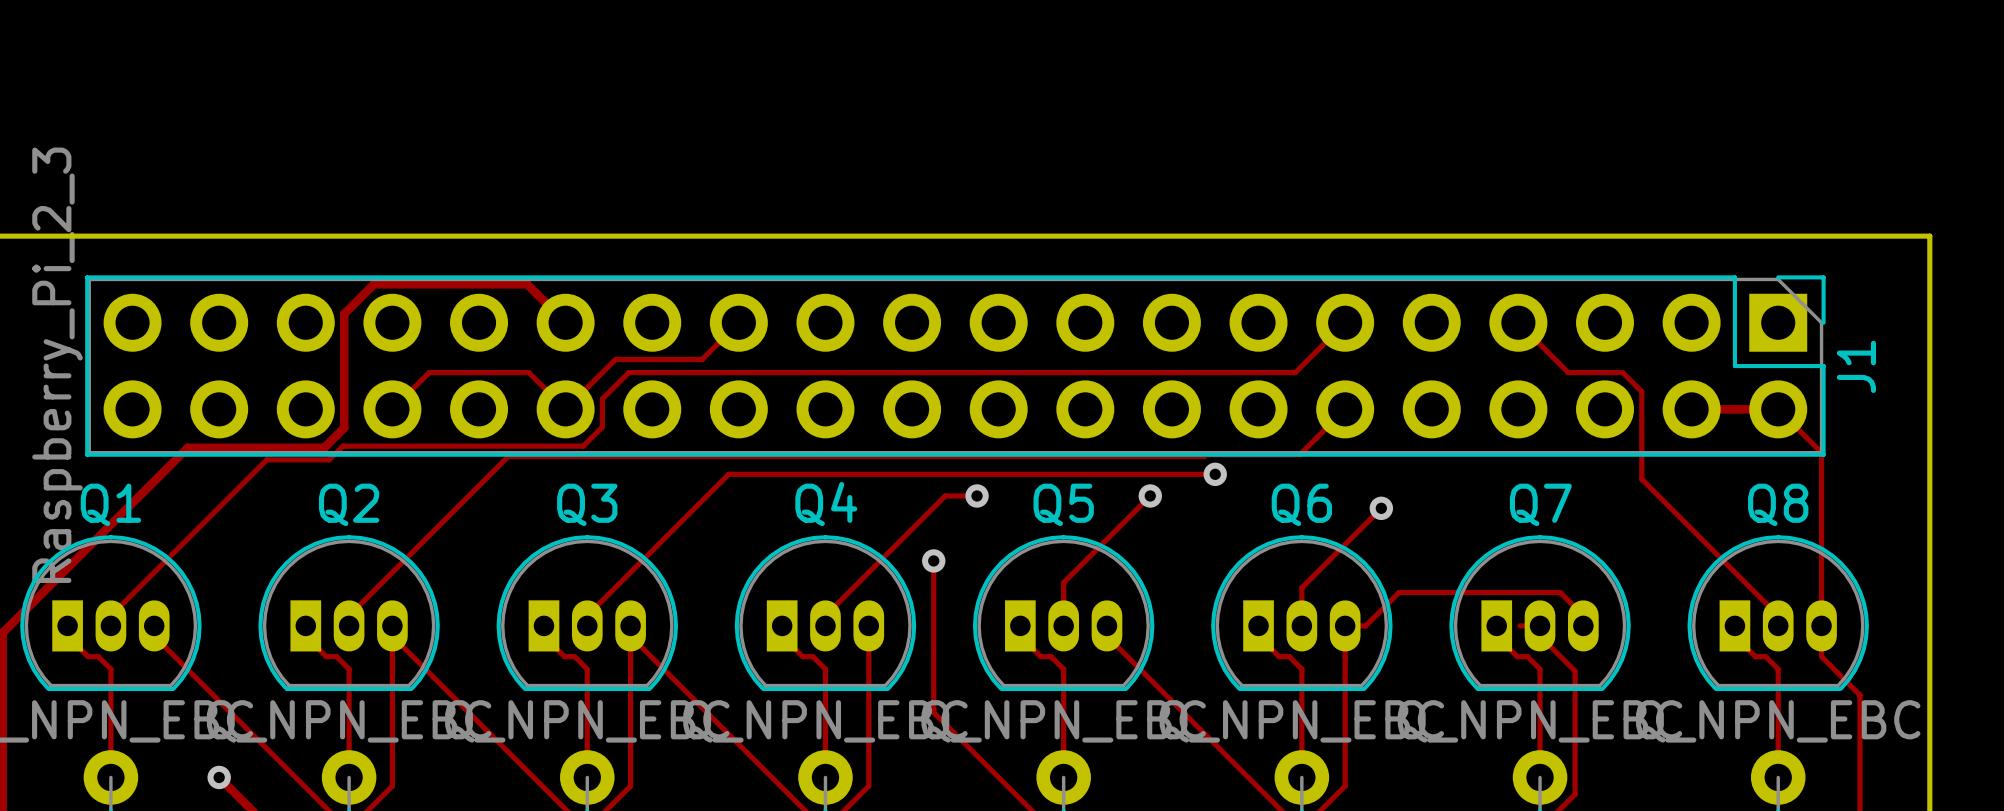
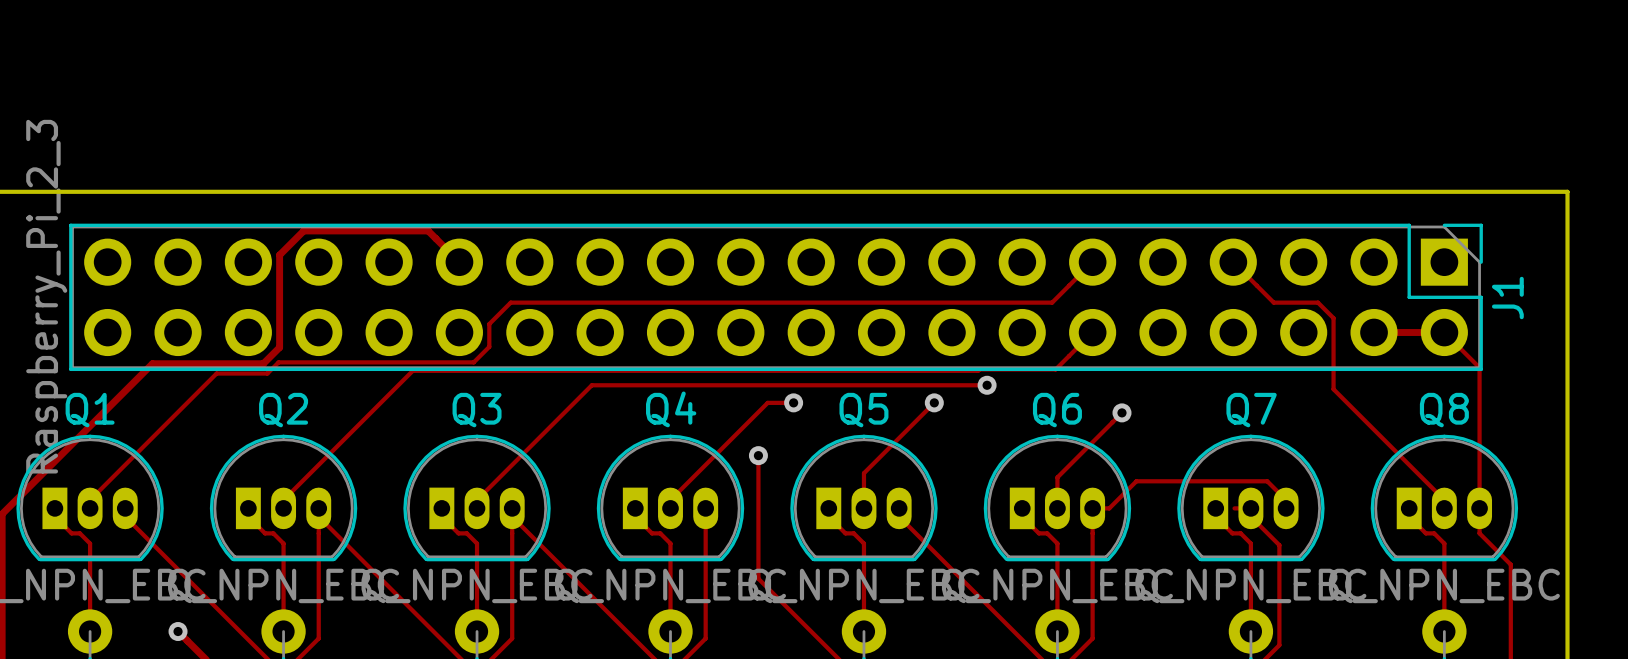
track: (738, 322) (702, 359) (615, 359) (565, 409) (528, 372) (429, 372) (392, 409) -> none

